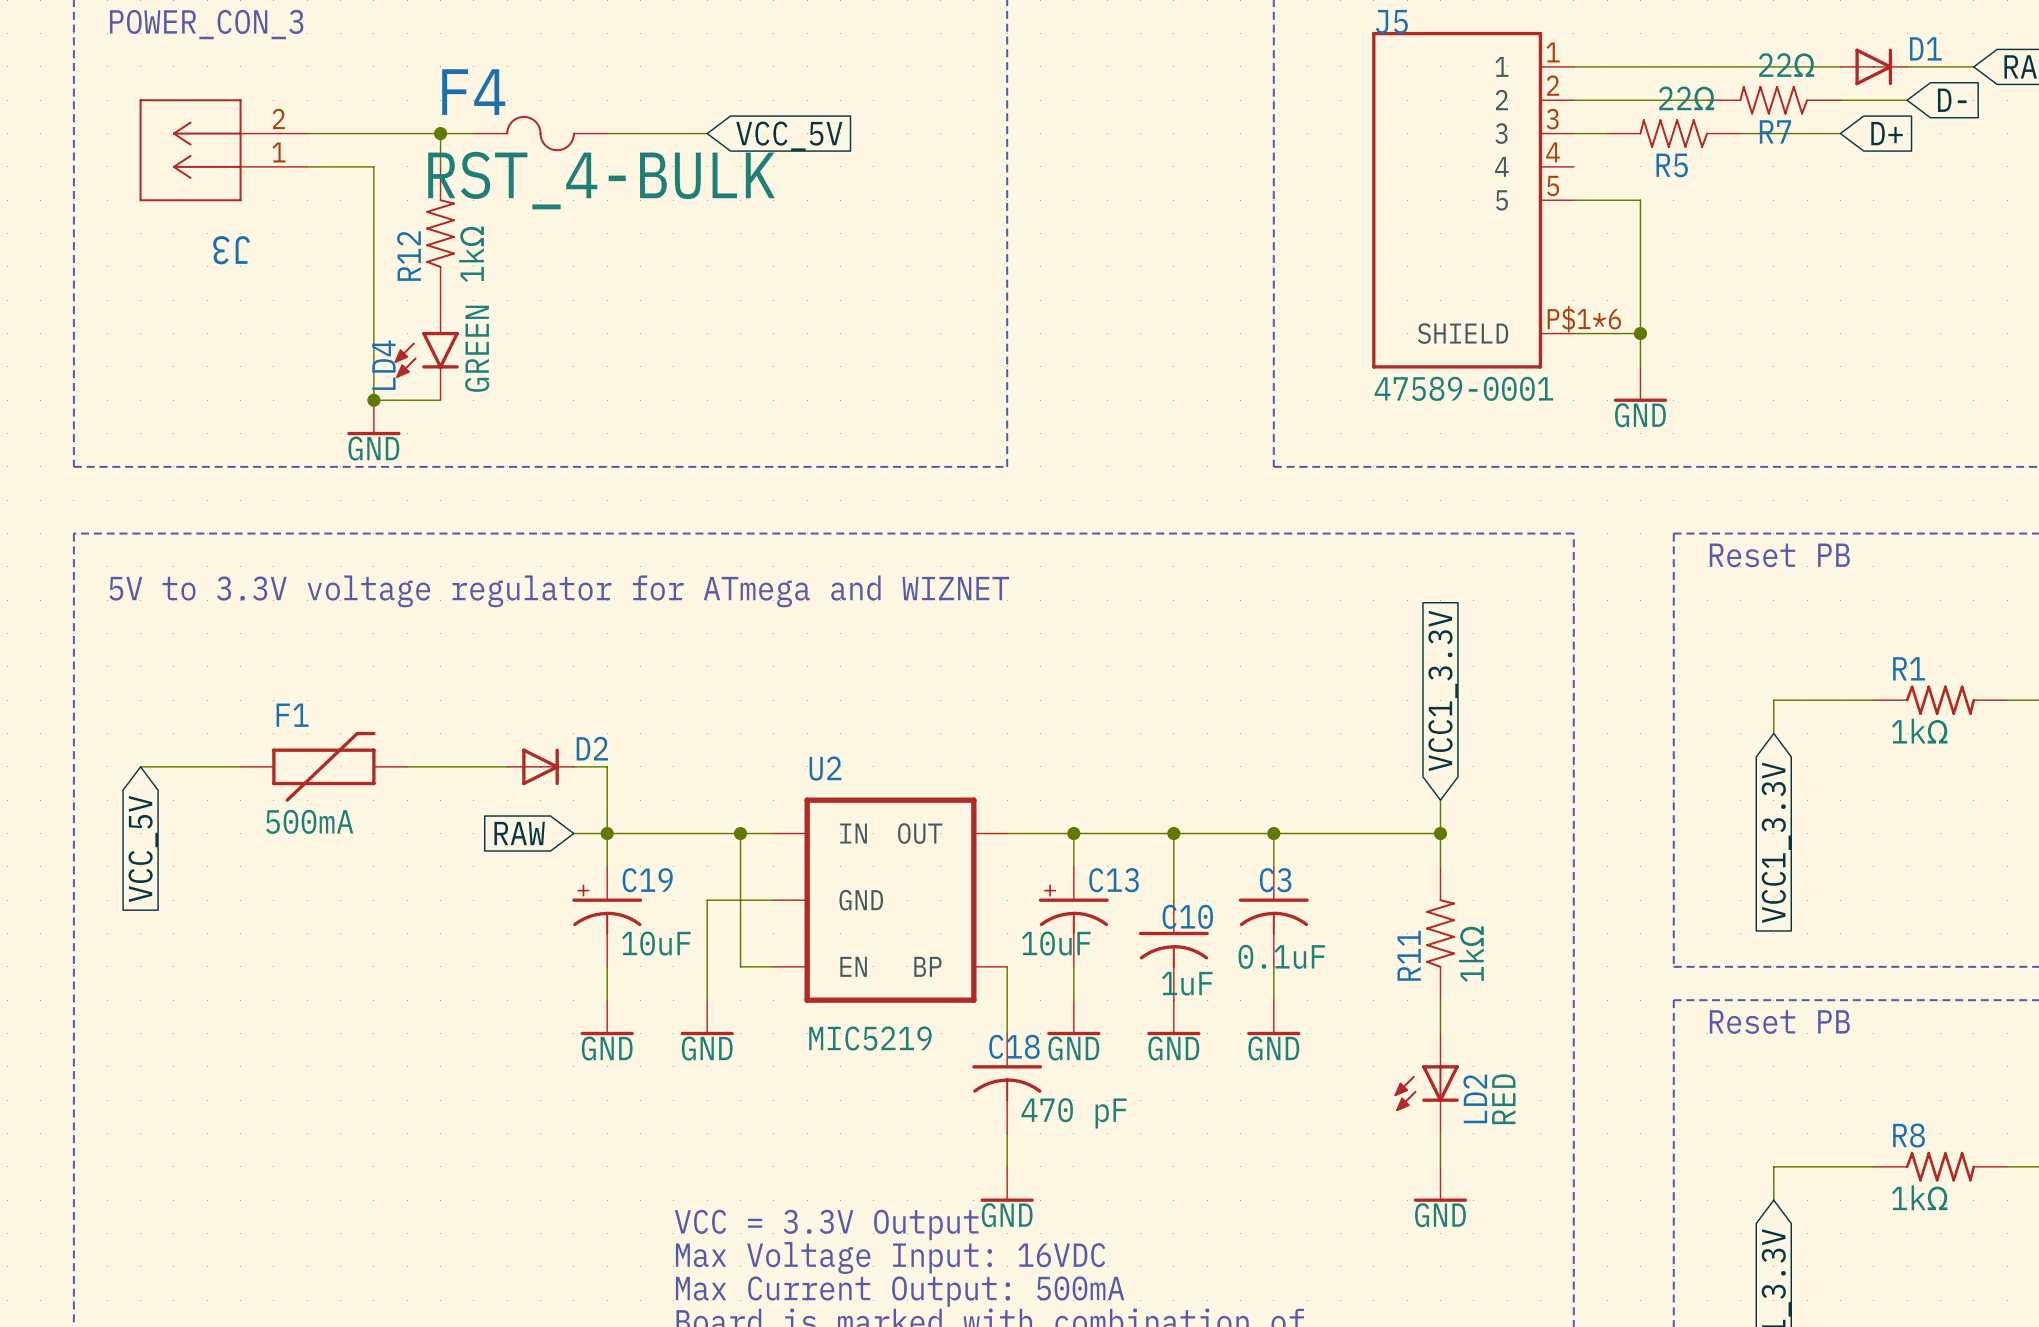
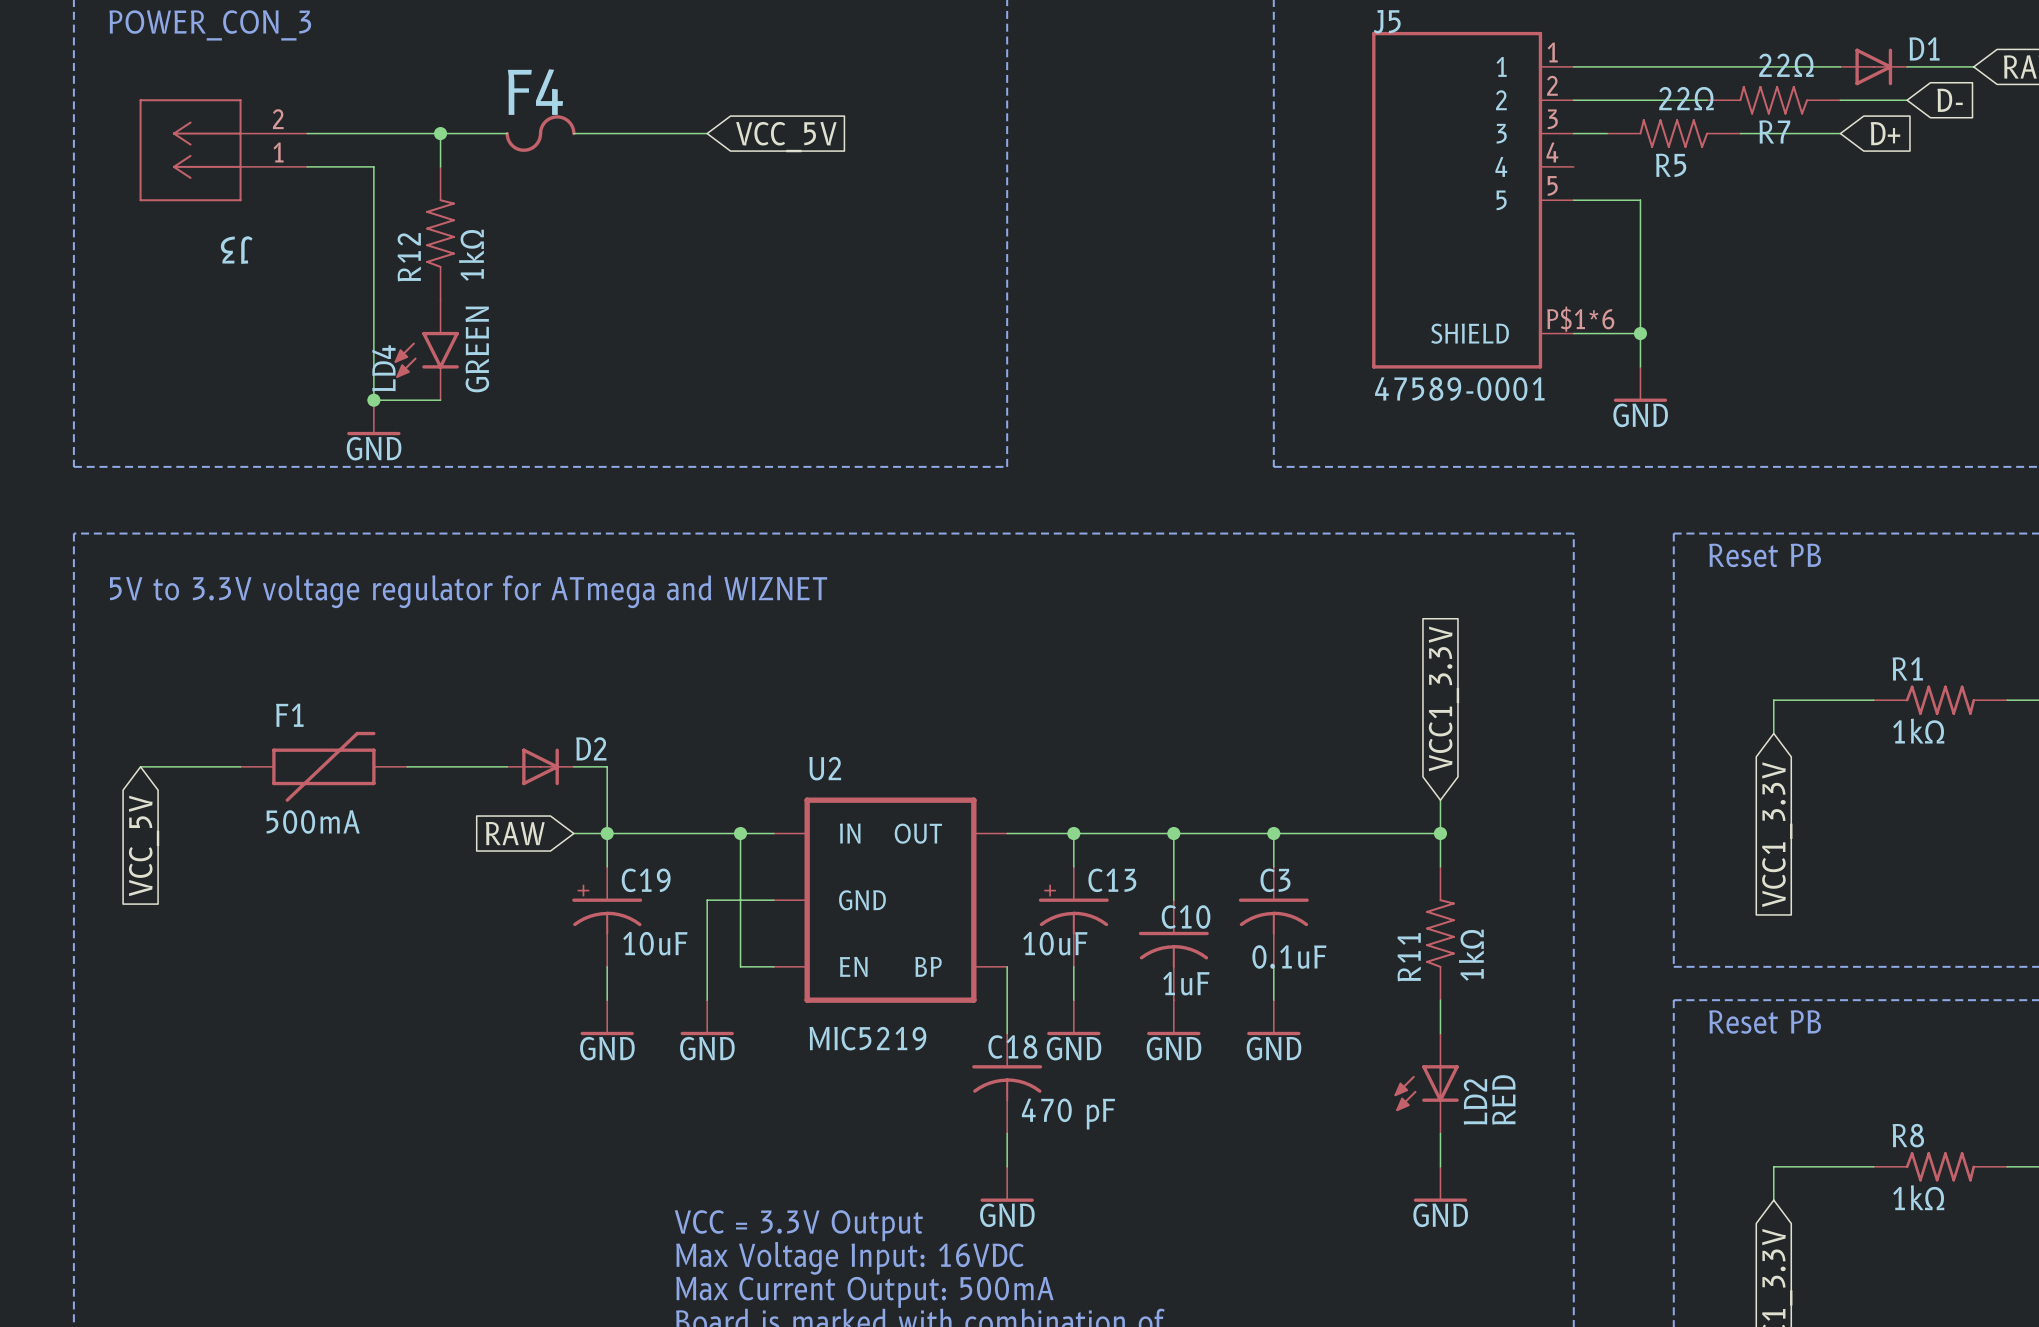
F4 name position: F4 (473, 92) -> F4 (535, 92)
F4 symbol: [473, 115, 608, 152] -> [505, 115, 576, 152]
F4 value: RST_4-BULK (601, 180) -> none

